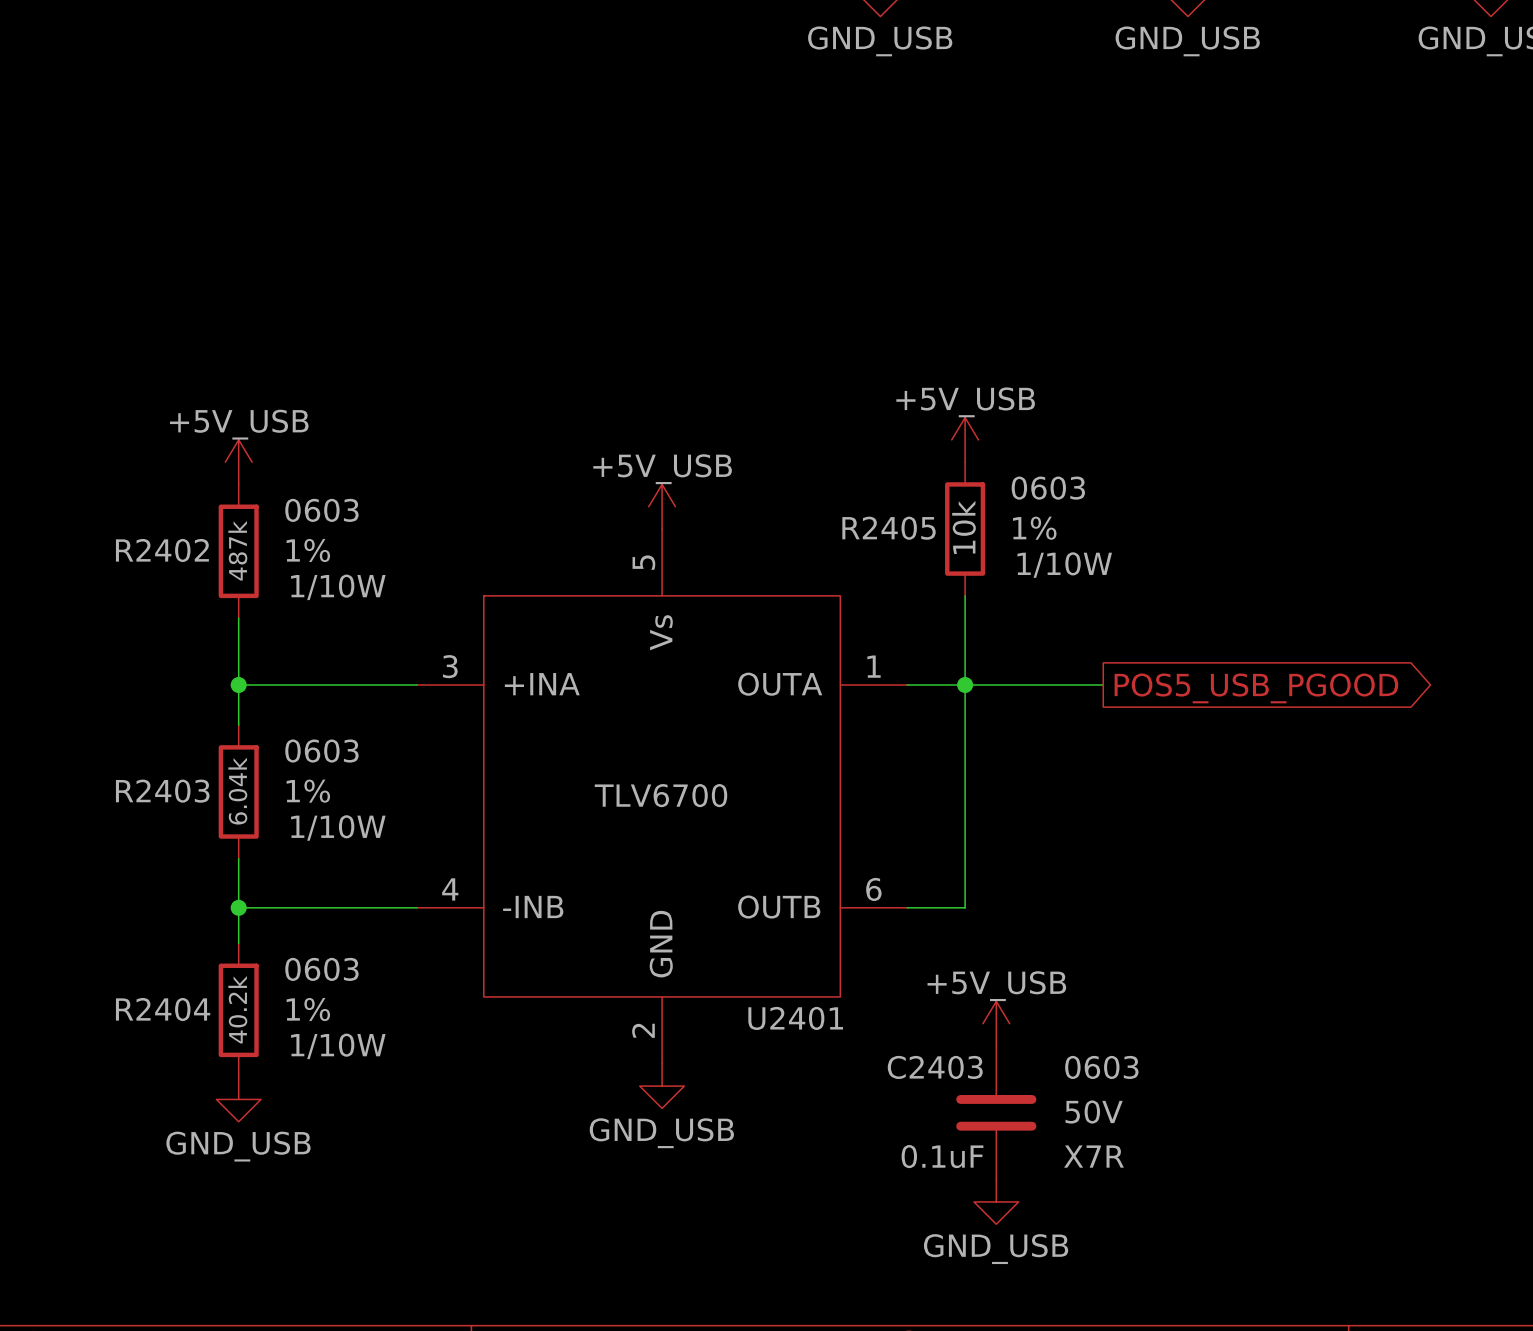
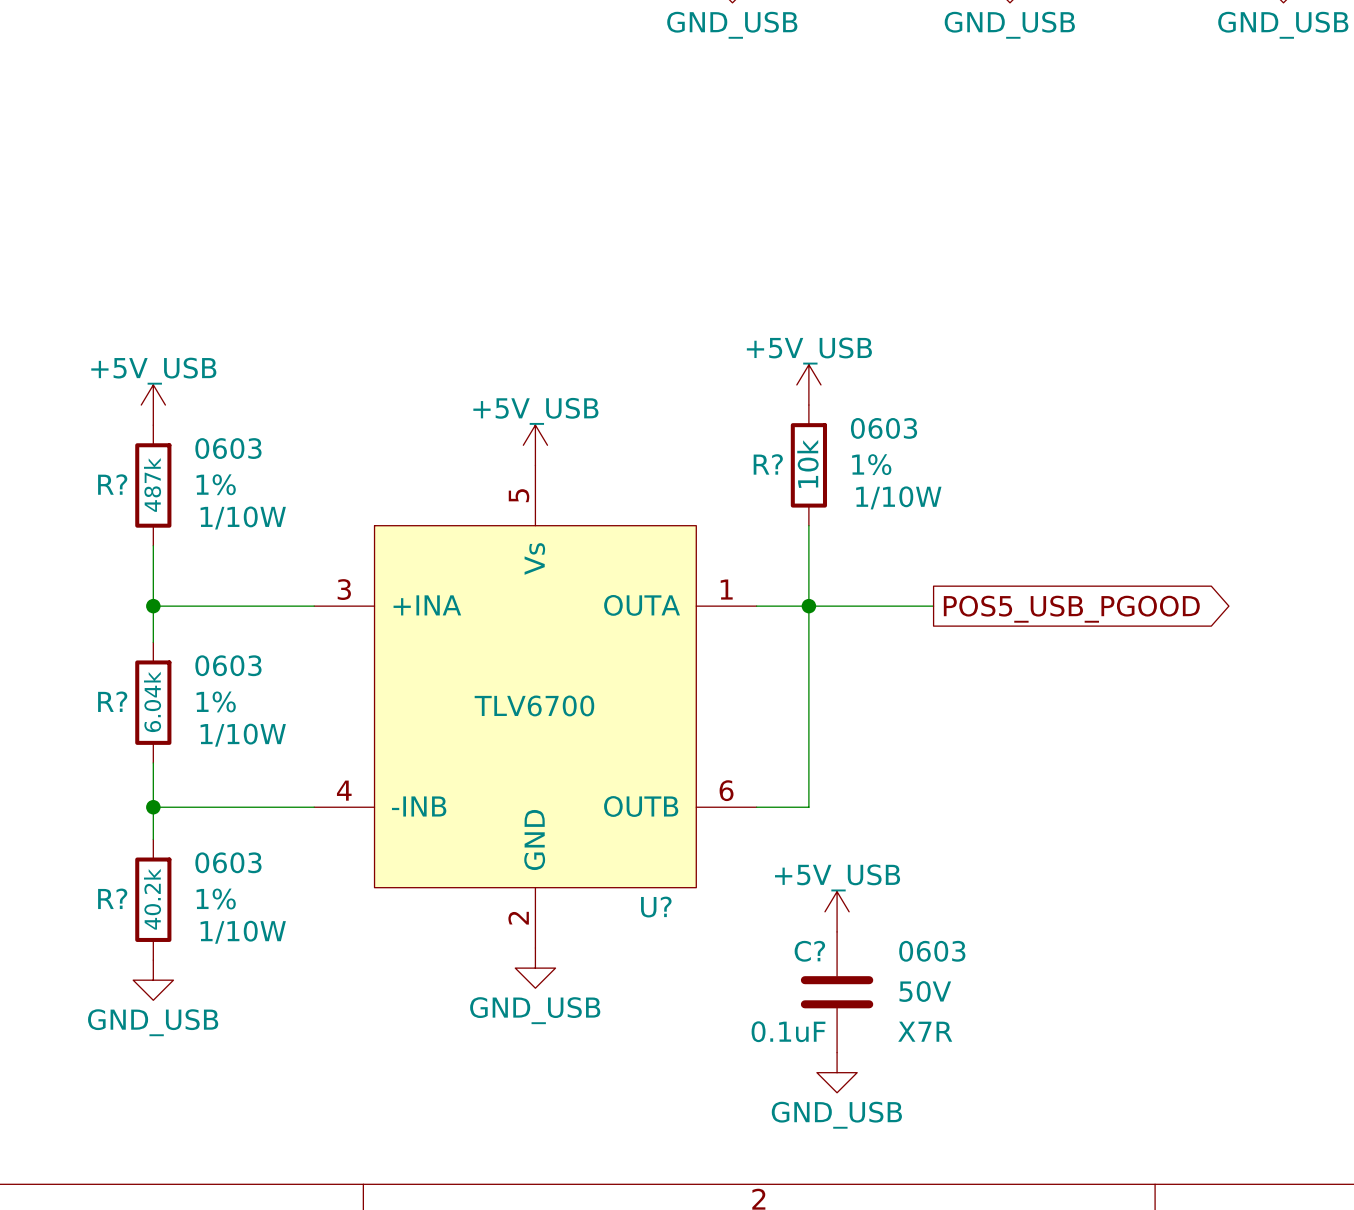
R2405 name: R2405 (889, 528) -> R? (768, 464)
R2402 name: R2402 (162, 550) -> R? (112, 484)
R2403 name: R2403 (162, 791) -> R? (112, 701)
R2404 name: R2404 (163, 1009) -> R? (112, 898)
U2401 name: U2401 (795, 1018) -> U? (656, 907)
C2403 name: C2403 (935, 1067) -> C? (809, 951)

